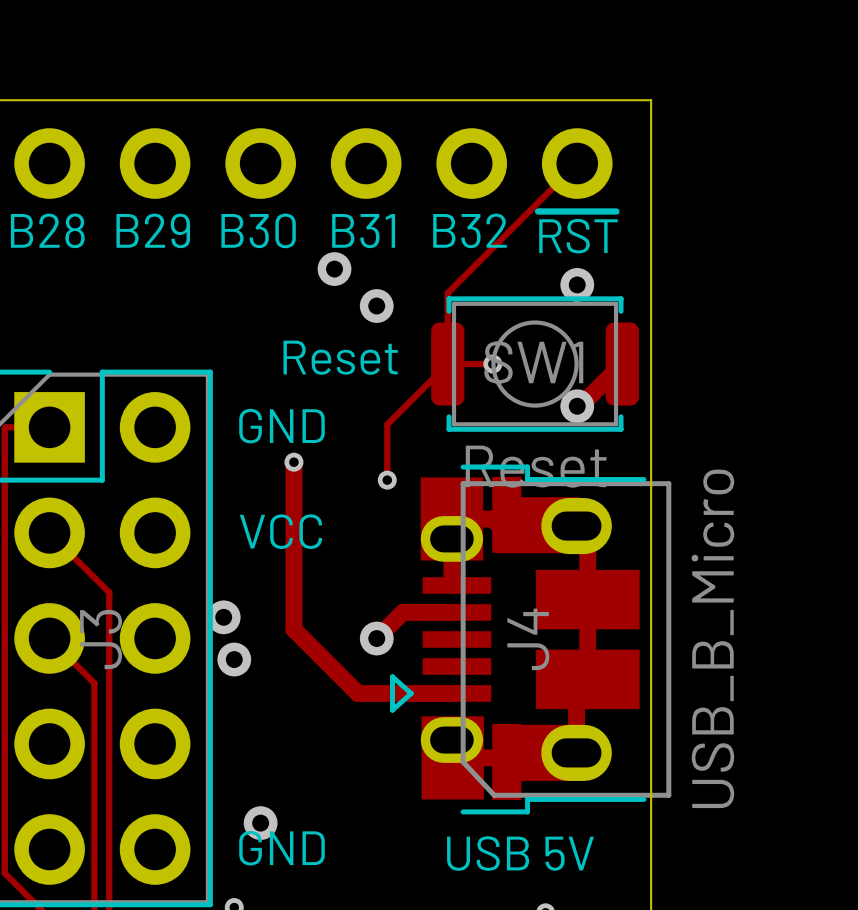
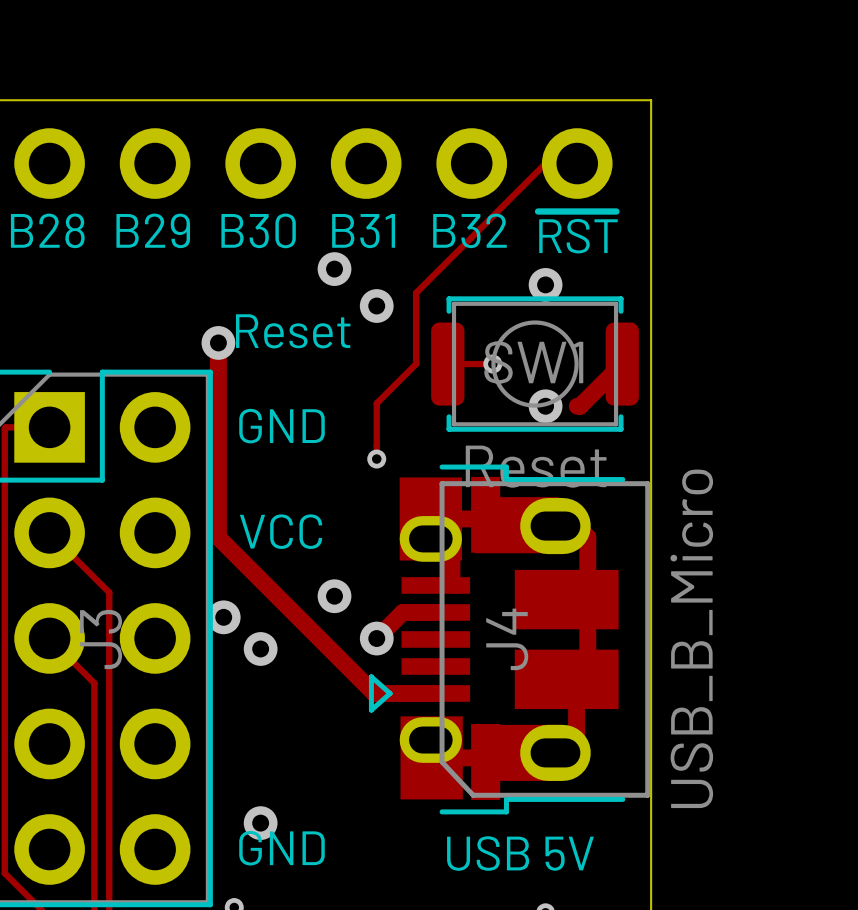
track: none -> (545, 163) (416, 293) (416, 364) (376, 403) (376, 459)
track: (577, 163) (447, 293) (447, 364) (387, 424) (387, 480) -> none
via position: (577, 284) -> (545, 284)
via: none -> (218, 342)
text position: Reset (340, 357) -> Reset (293, 331)
via position: (577, 406) -> (545, 406)
track: (293, 462) (293, 629) (357, 693) (374, 693) -> (218, 342) (218, 537) (374, 693)
via: (293, 462) -> none
via position: (387, 480) -> (376, 459)
via: none -> (334, 596)
J4 position: (530, 639) -> (509, 639)
via position: (234, 659) -> (260, 648)

